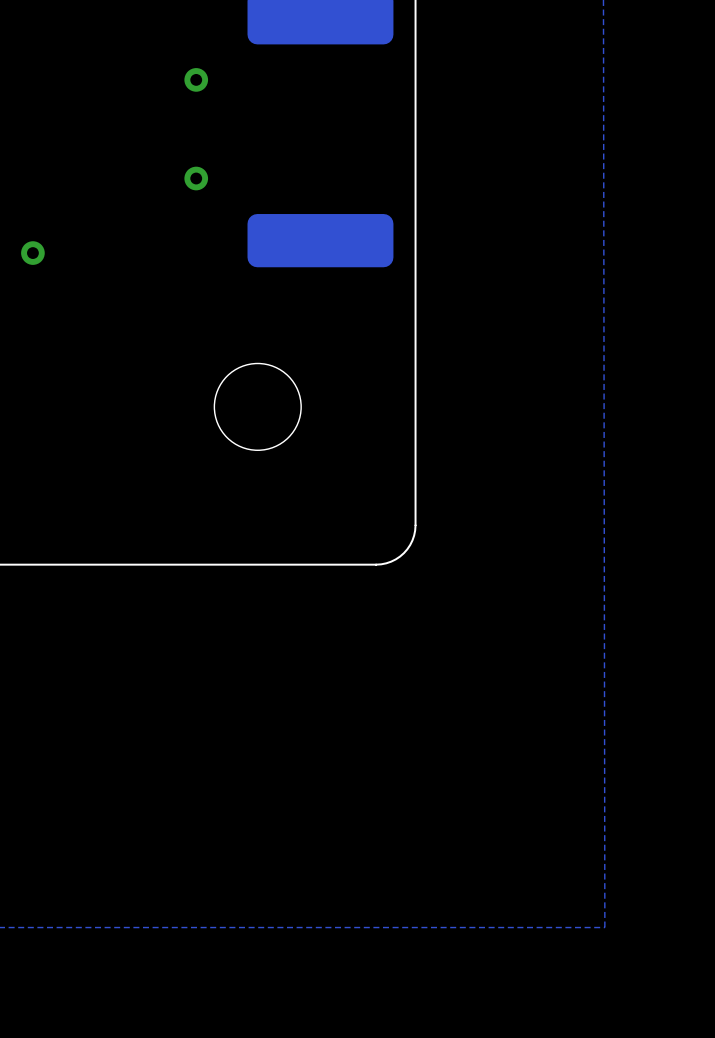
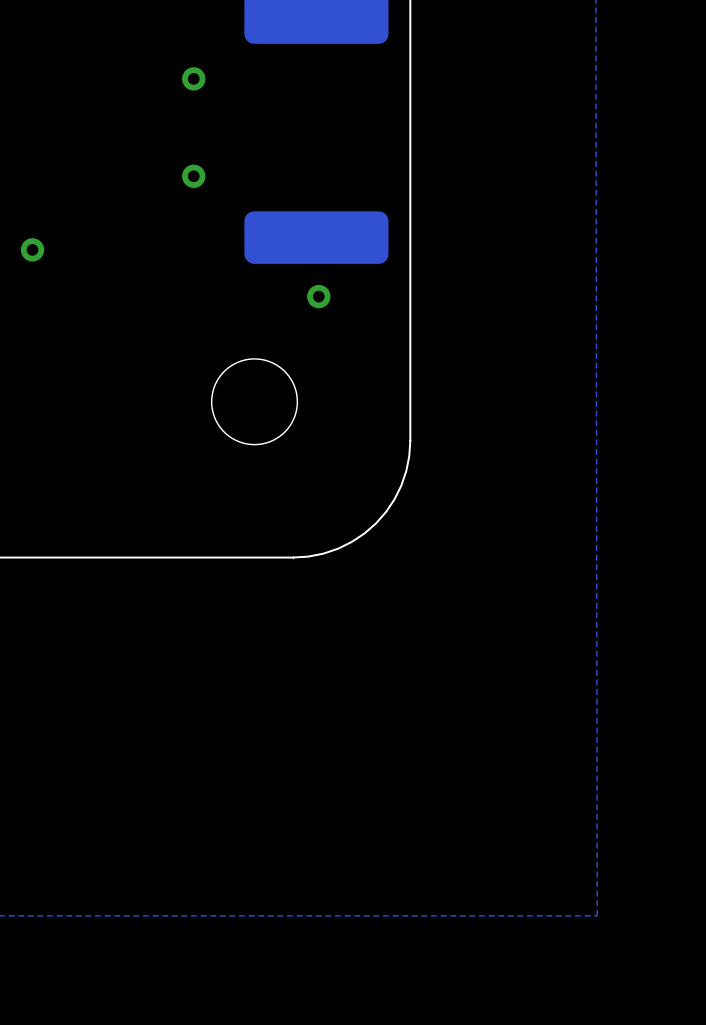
via: none -> (318, 296)
board edge: (415, 446) (415, 530) (412, 540) (403, 553) (391, 561) (381, 564) (297, 564) -> (410, 440) (409, 455) (401, 485) (394, 499) (376, 523) (364, 533) (338, 548) (308, 556) (293, 557)

